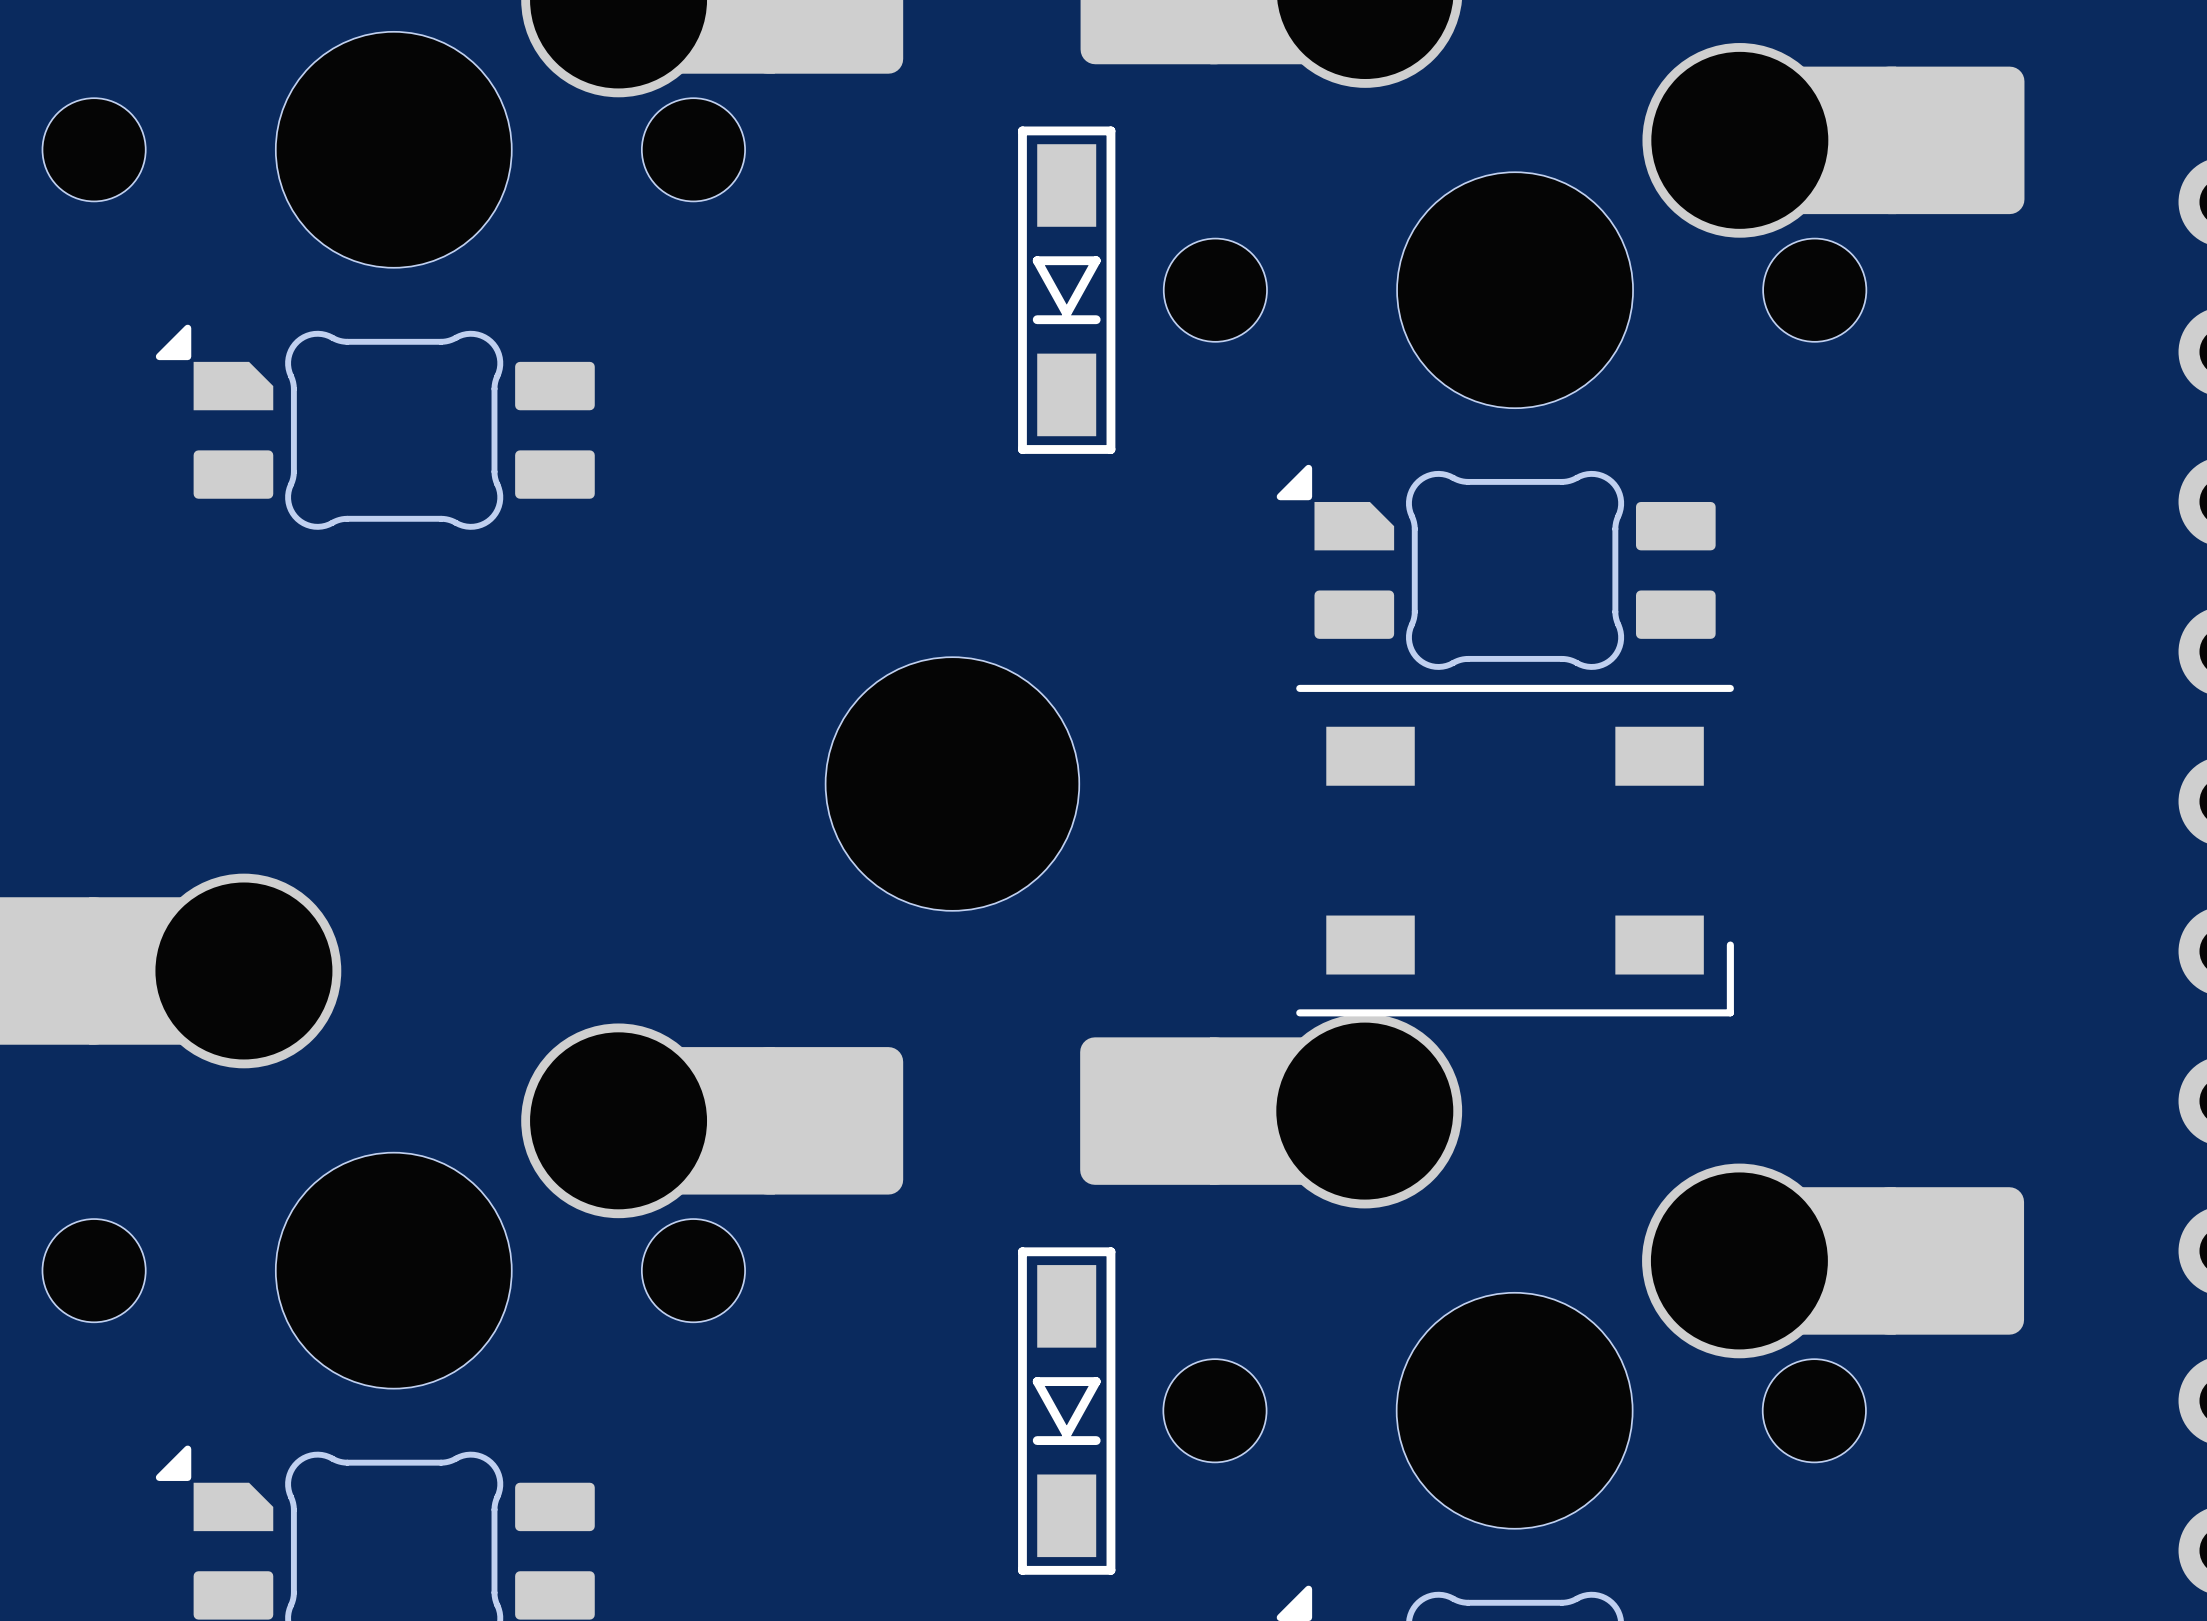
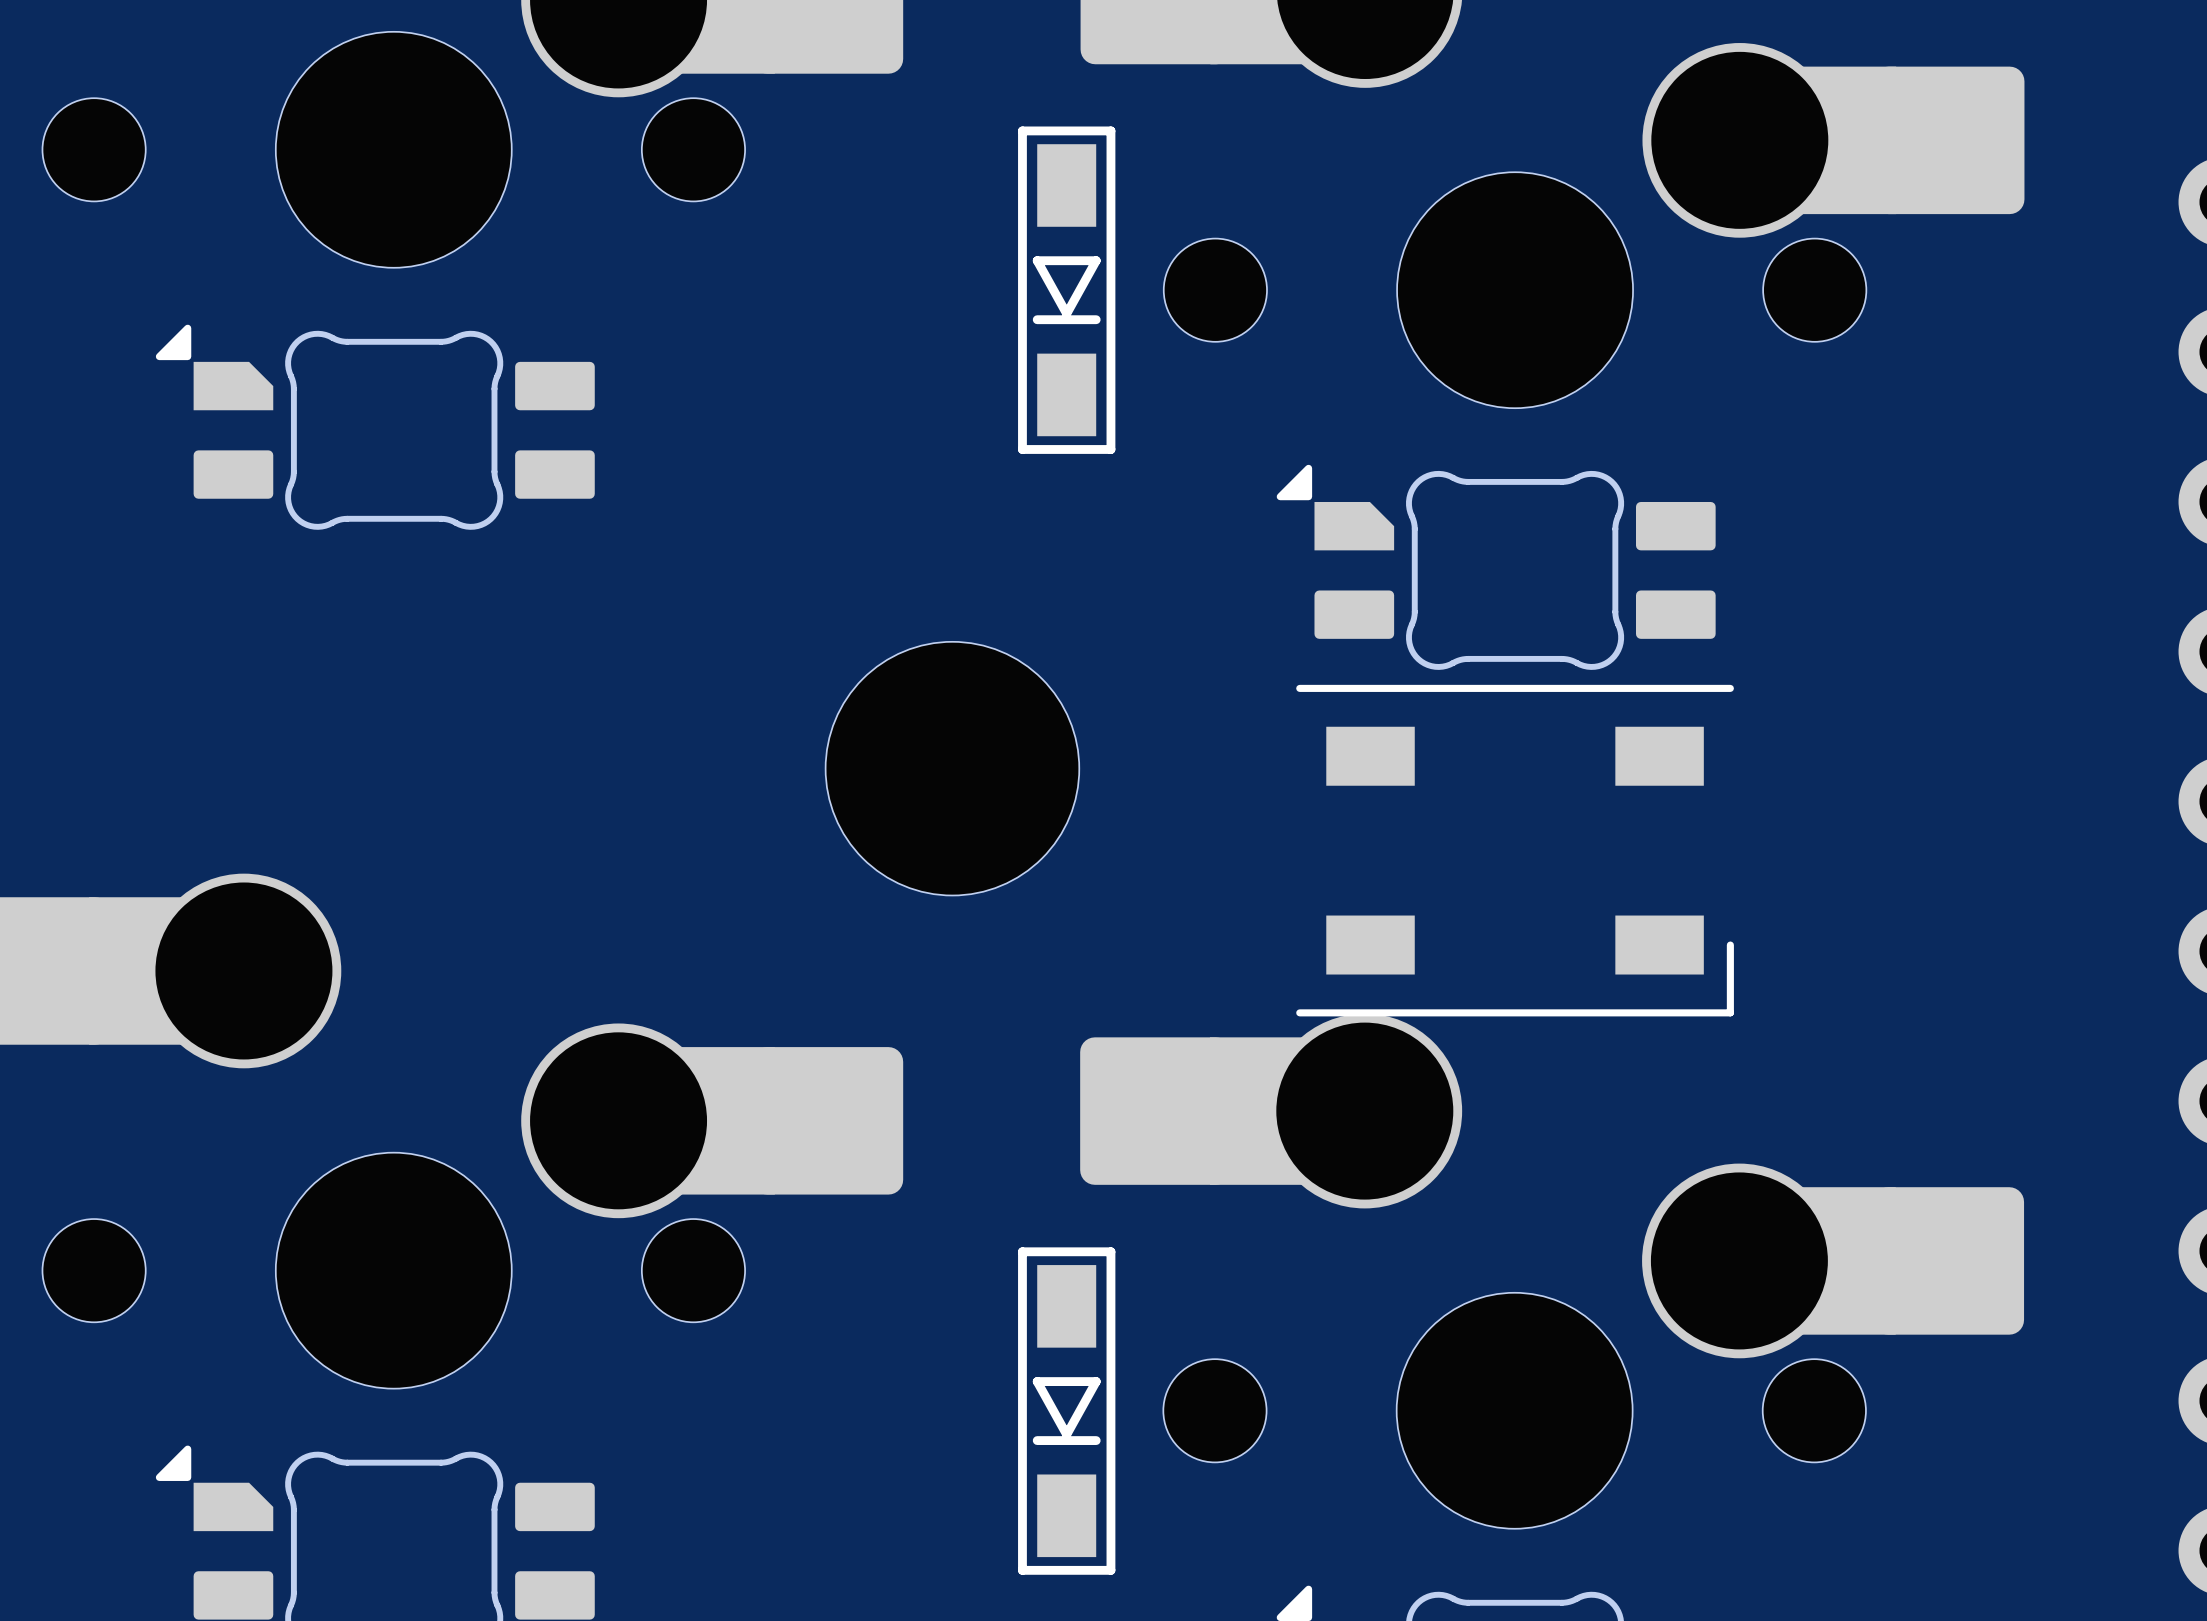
part position: (952, 784) -> (952, 768)

